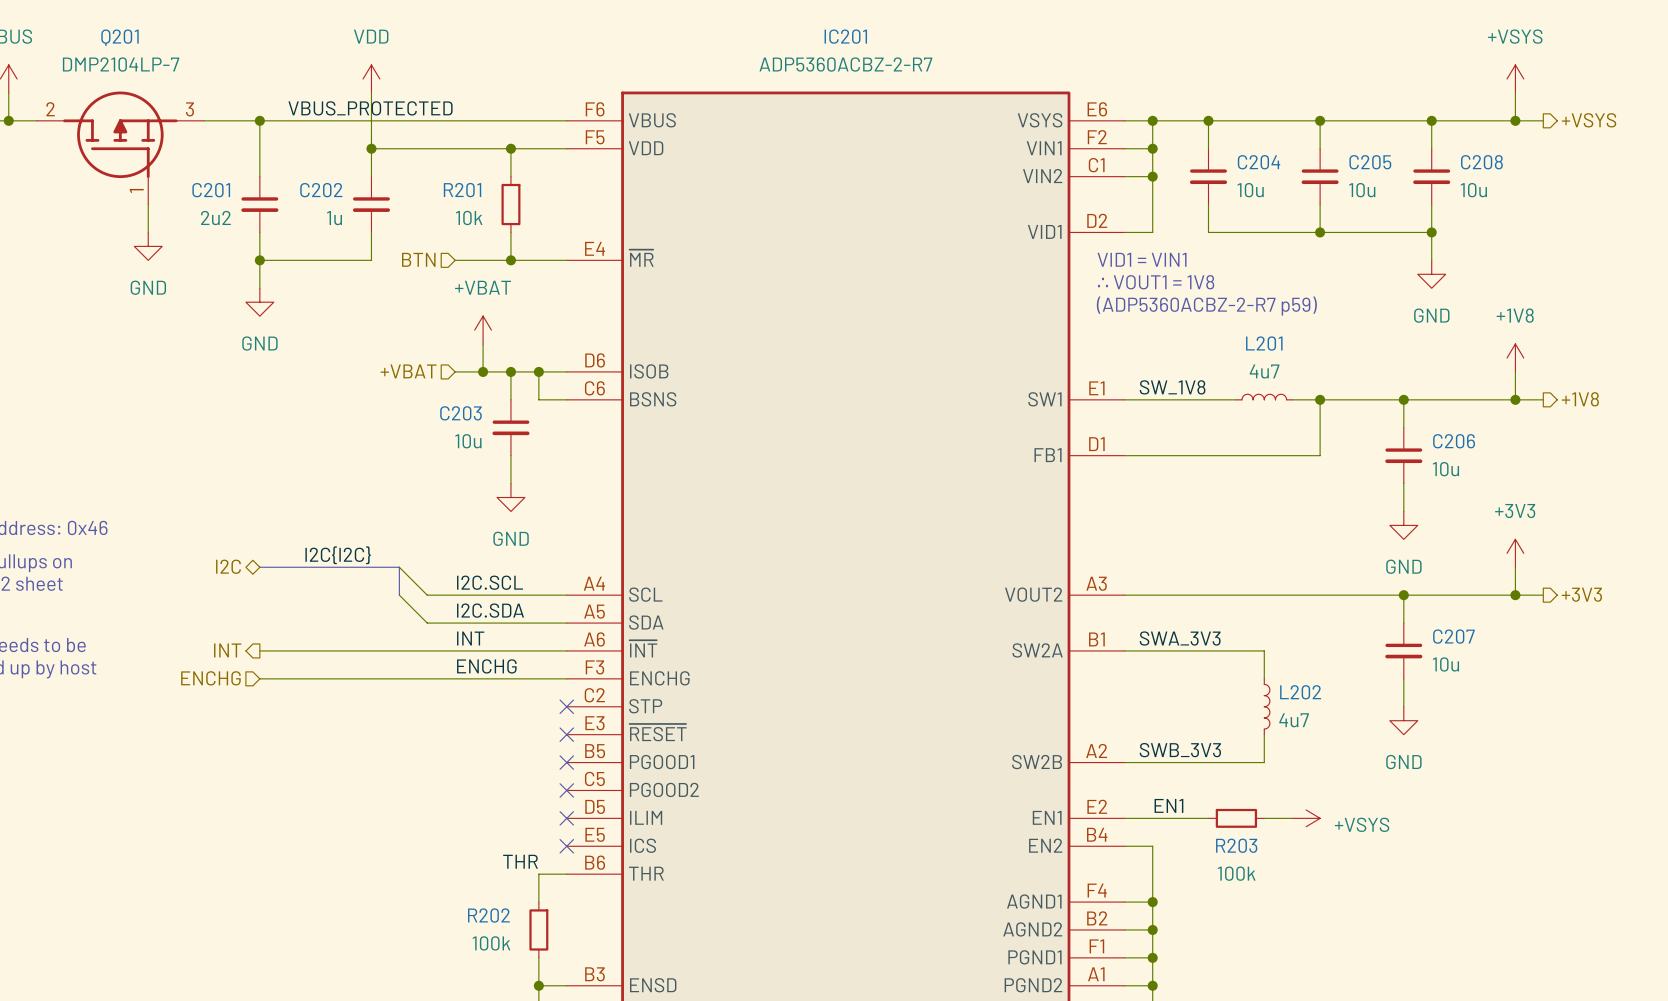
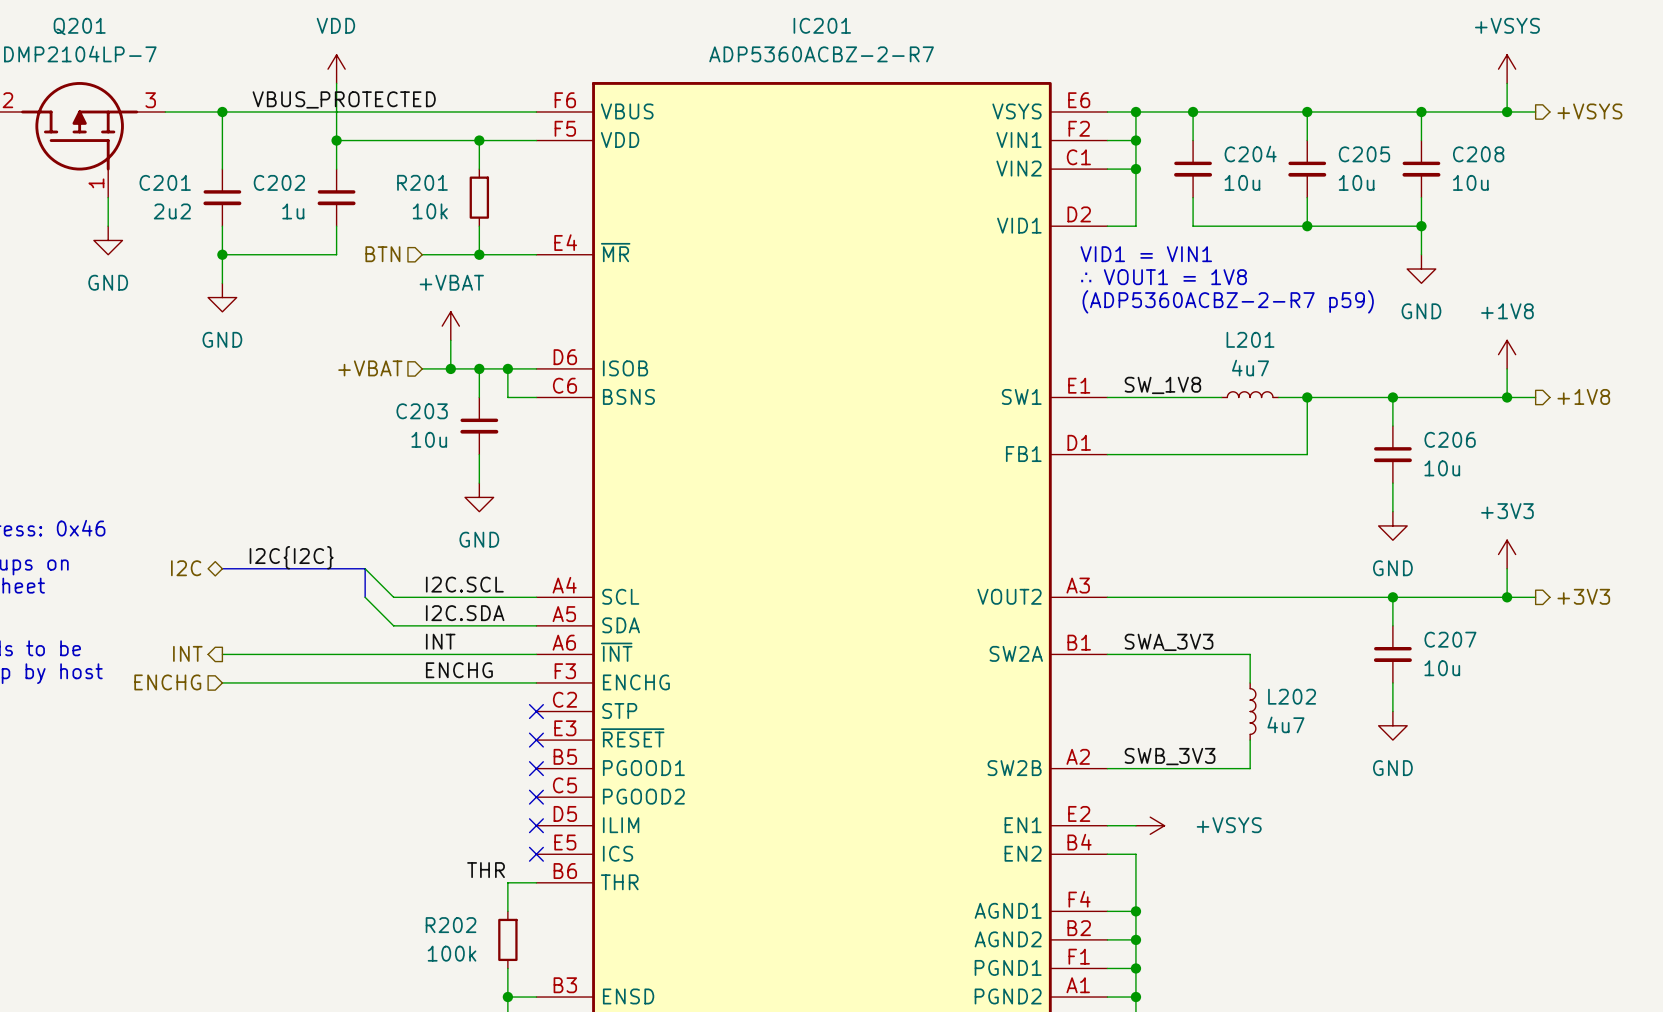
label: EN1 (1168, 805) -> none
wire: (1152, 818) (1208, 818) -> none
R203: 100k (1236, 818) -> none
wire: (1264, 818) (1292, 818) -> none
power symbol position: +VSYS (1306, 818) -> +VSYS (1150, 825)
power symbol text position: +VSYS (1362, 824) -> +VSYS (1229, 825)

